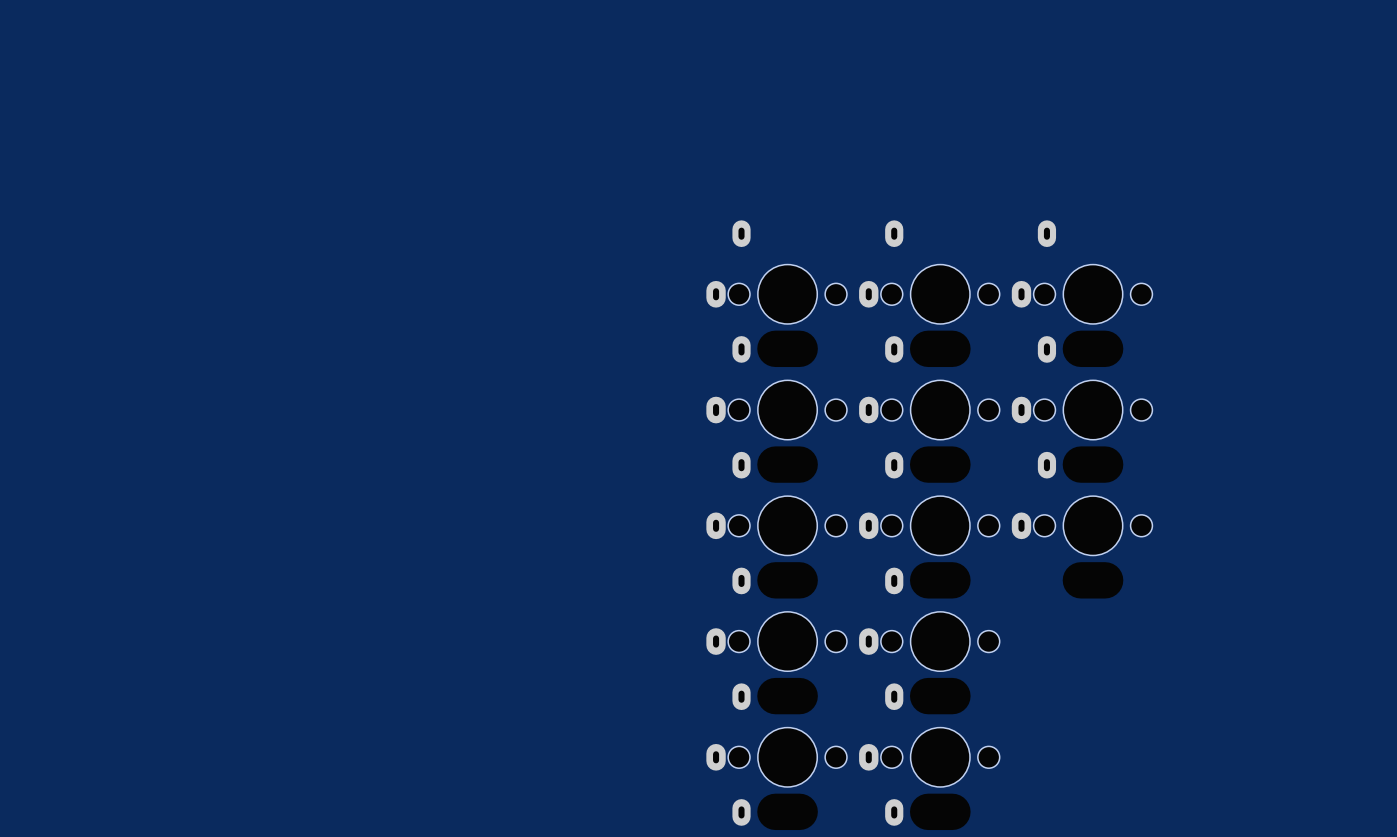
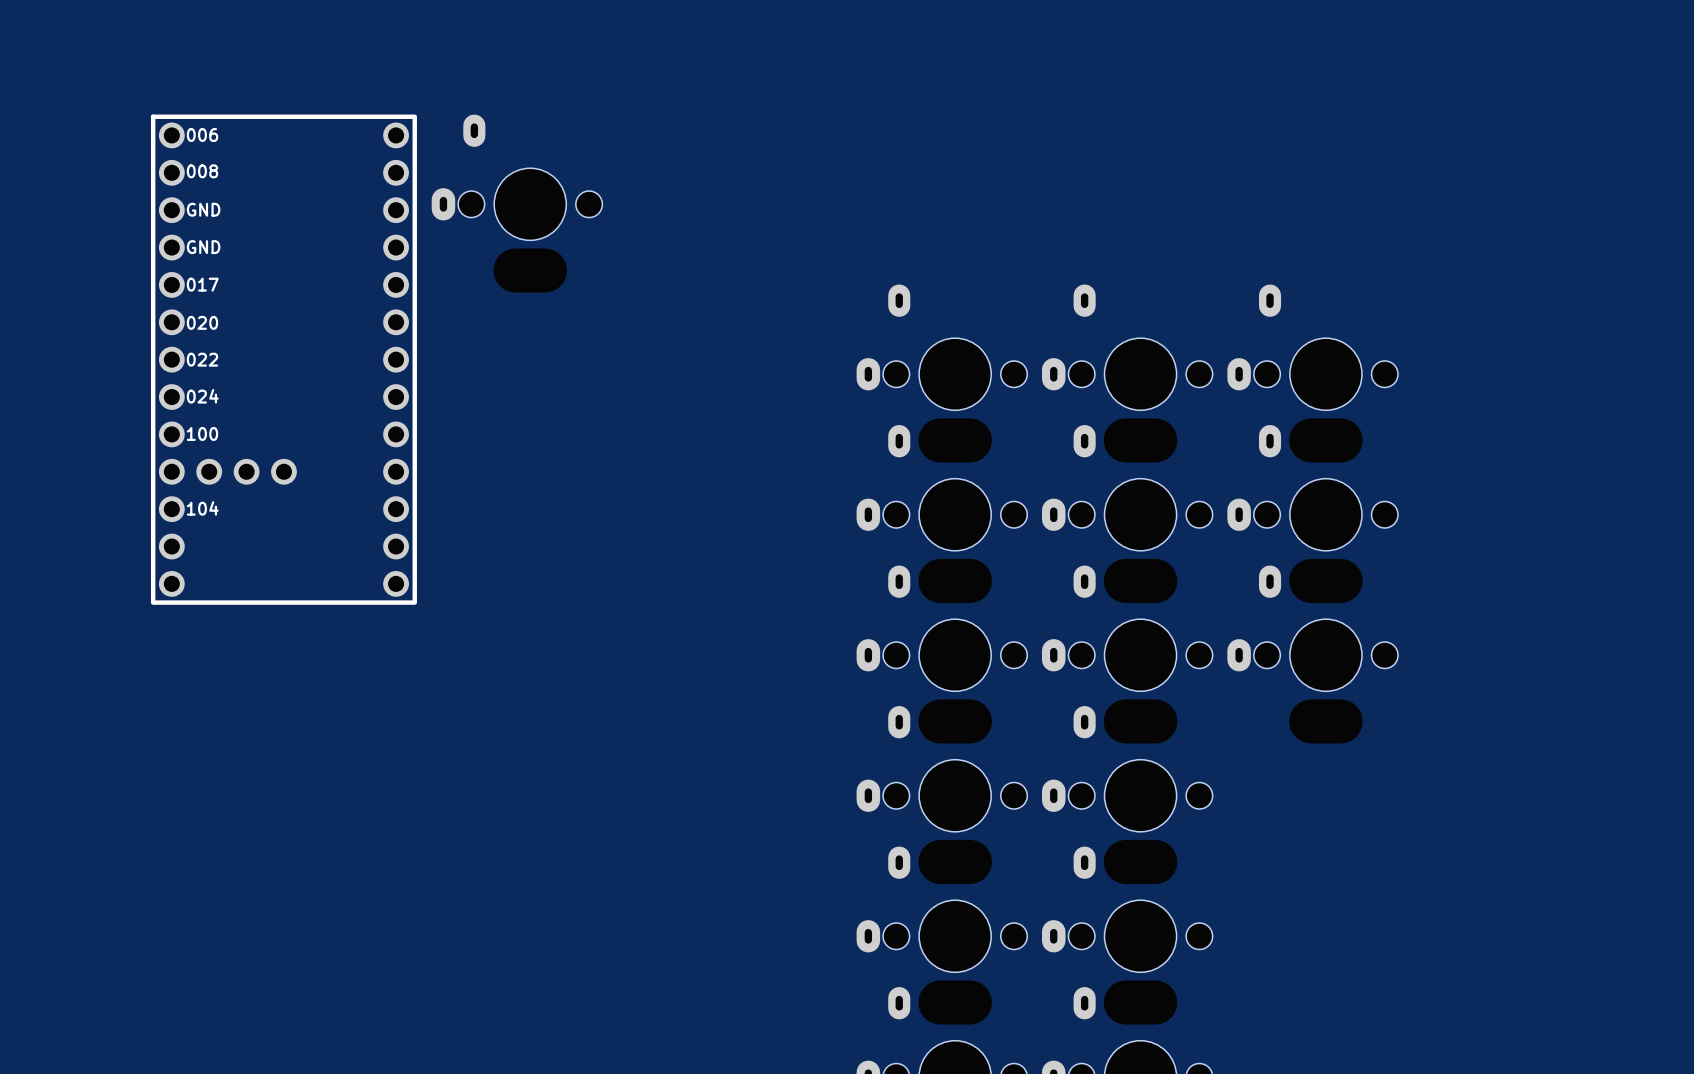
part: none -> (517, 203)
part: none -> (283, 359)

